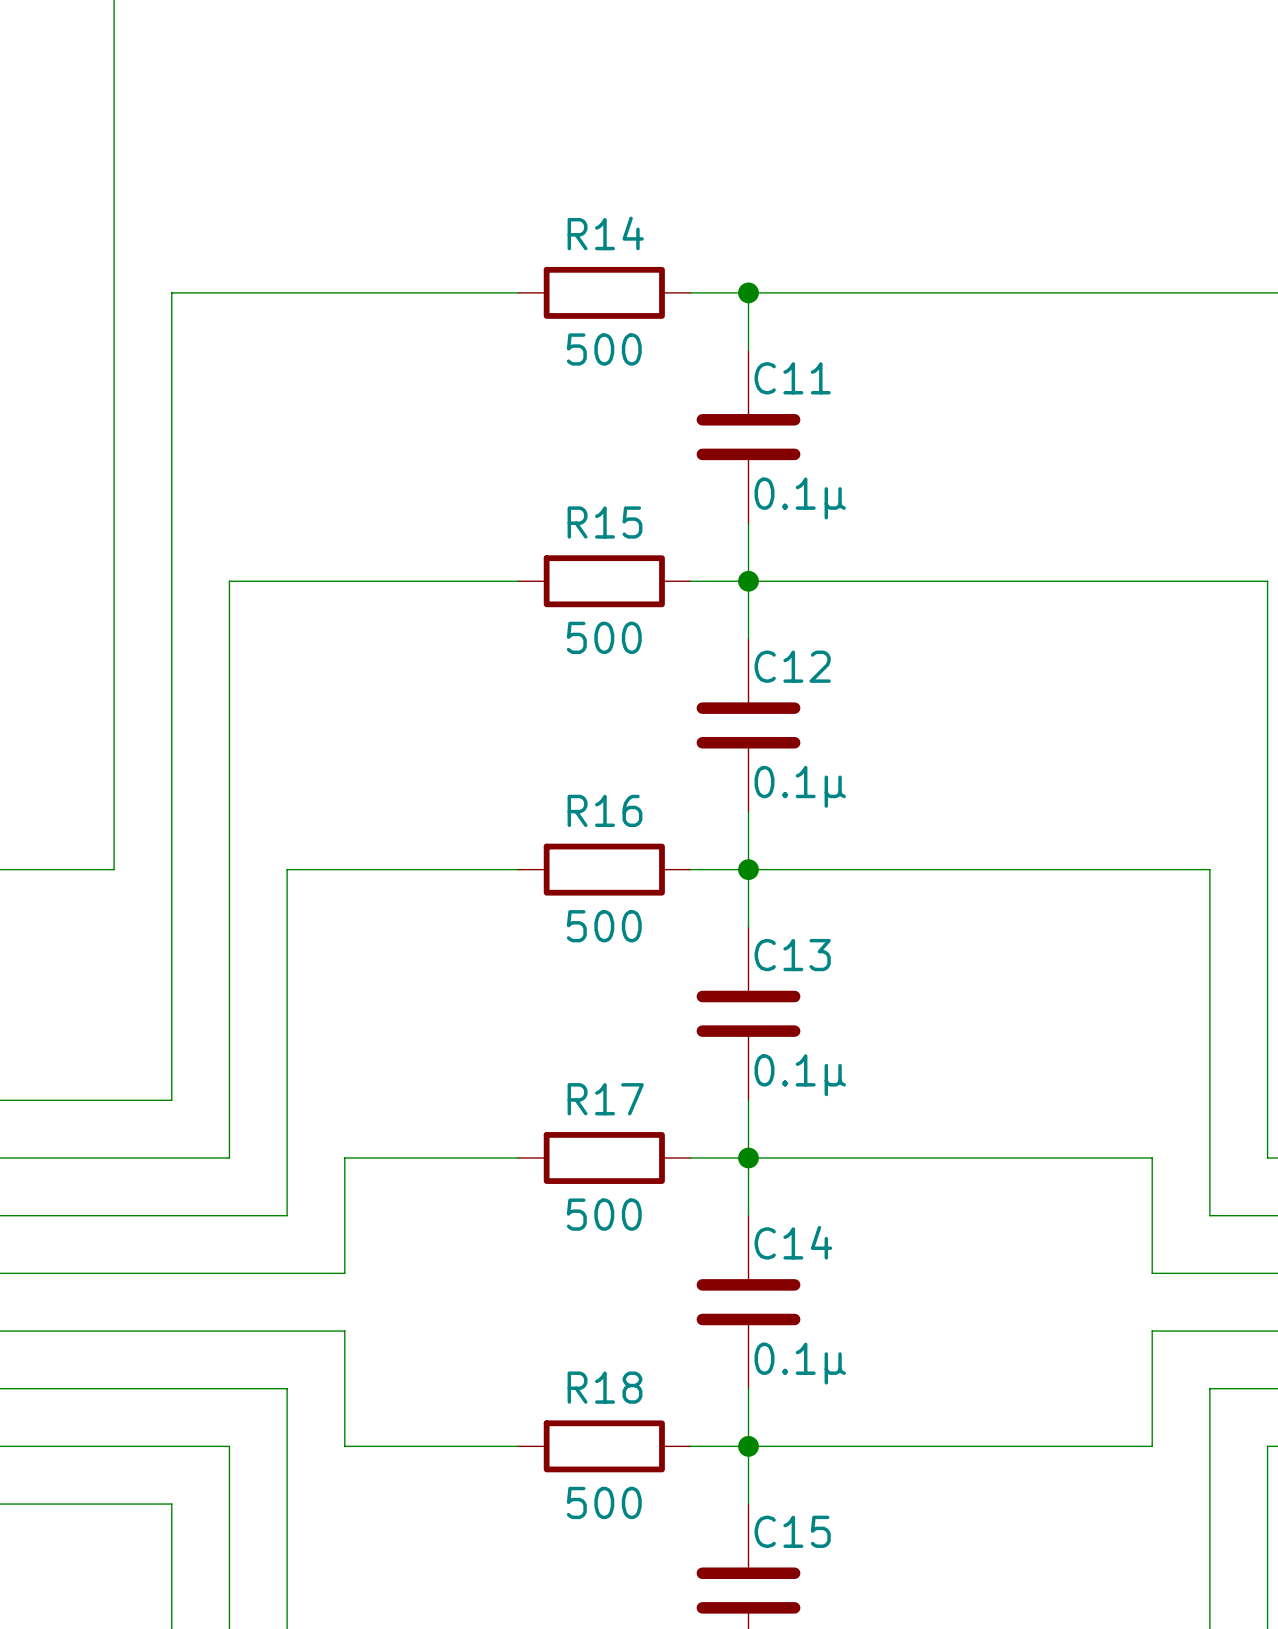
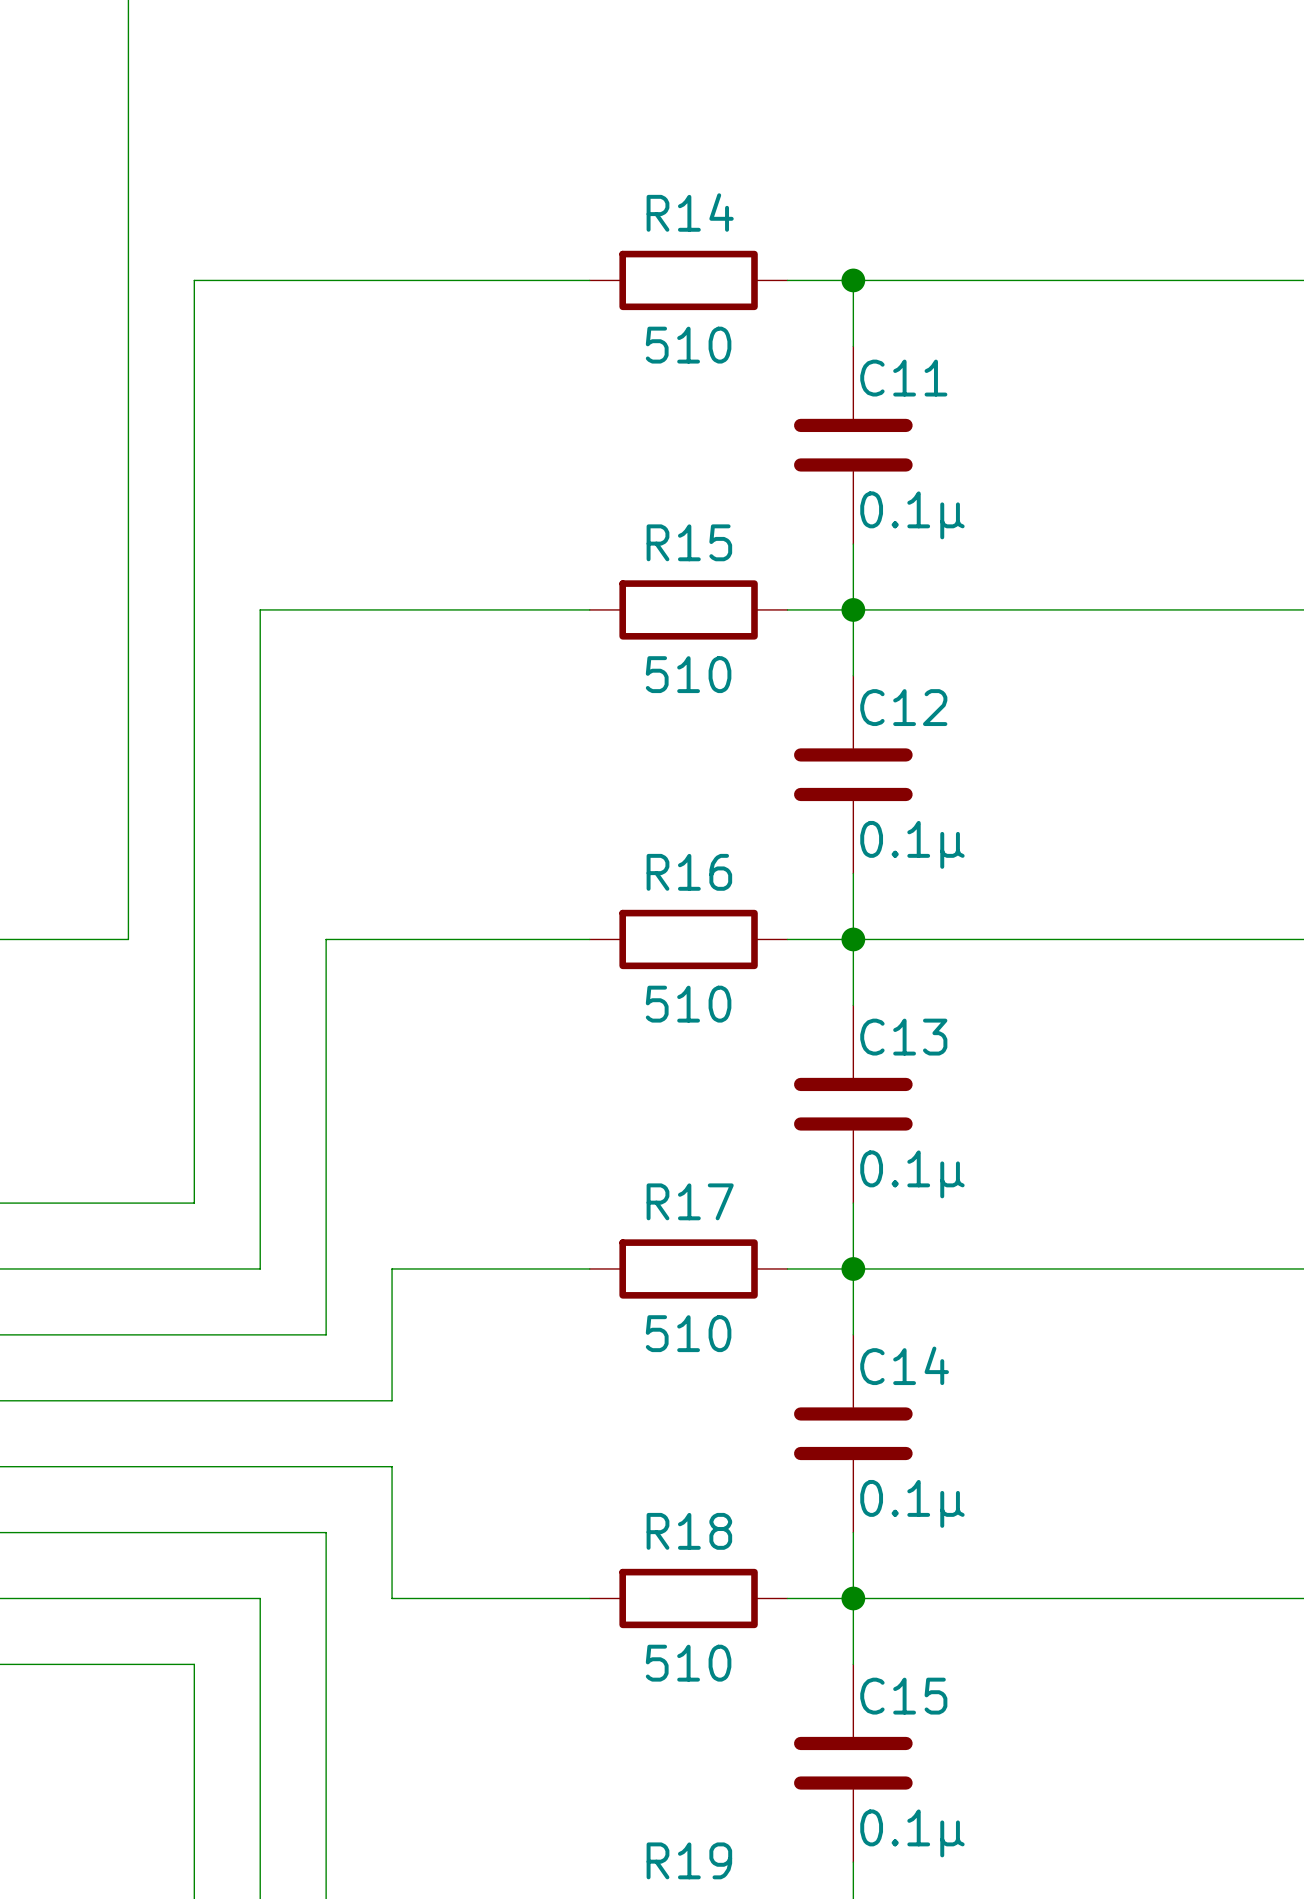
R14 value: 500 (604, 349) -> 510 (688, 345)
R15 value: 500 (604, 637) -> 510 (688, 674)
R16 value: 500 (604, 926) -> 510 (688, 1004)
R17 value: 500 (604, 1214) -> 510 (688, 1333)
R18 value: 500 (604, 1502) -> 510 (688, 1663)

